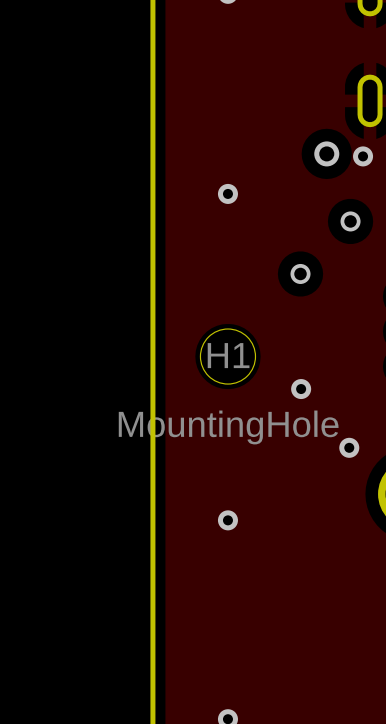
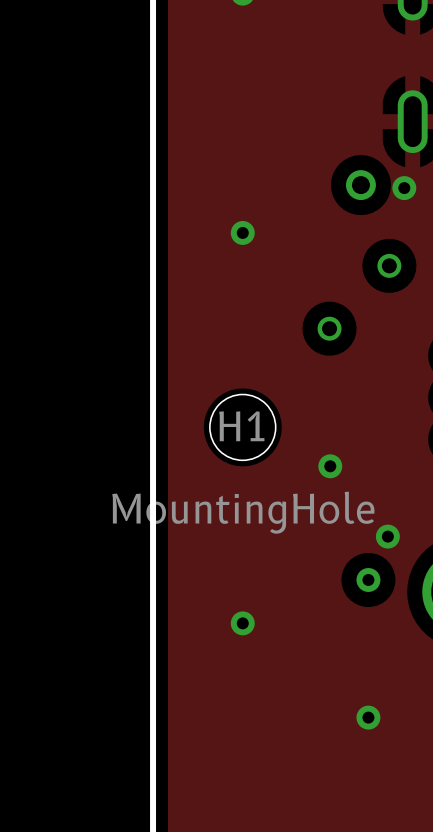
via: none -> (368, 579)
via: none -> (368, 717)

